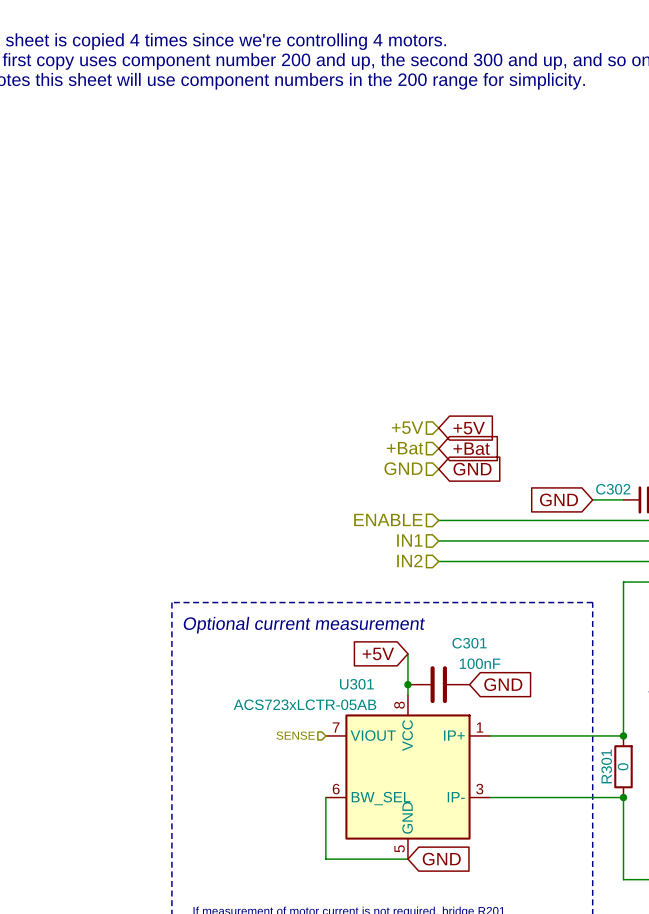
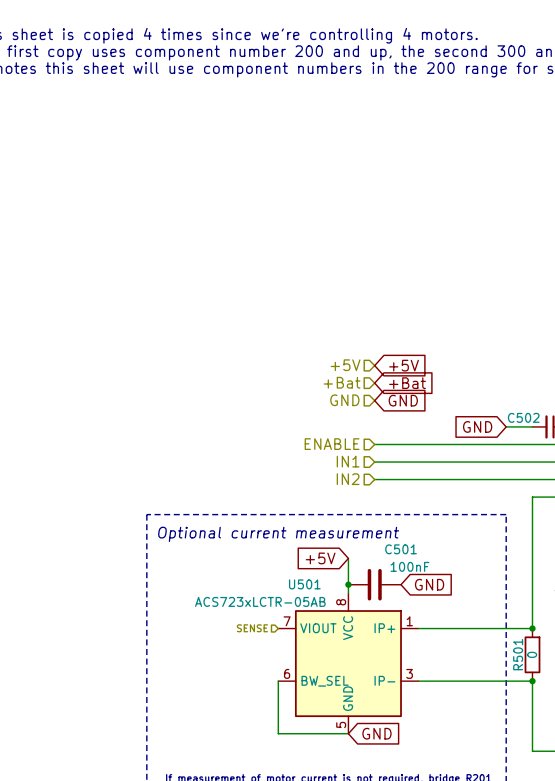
C302 name: C302 (613, 489) -> C502 (523, 417)
C301 name: C301 (469, 643) -> C501 (401, 549)
U301 name: U301 (356, 684) -> U501 (304, 584)
R301 name: R301 (606, 766) -> R501 (518, 654)

